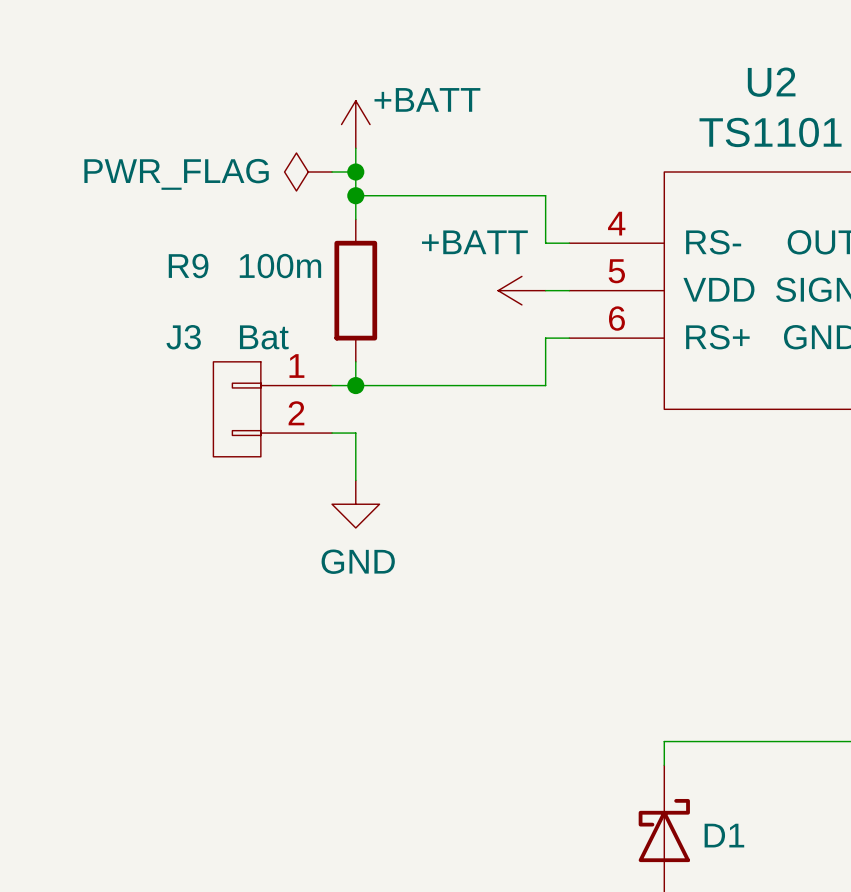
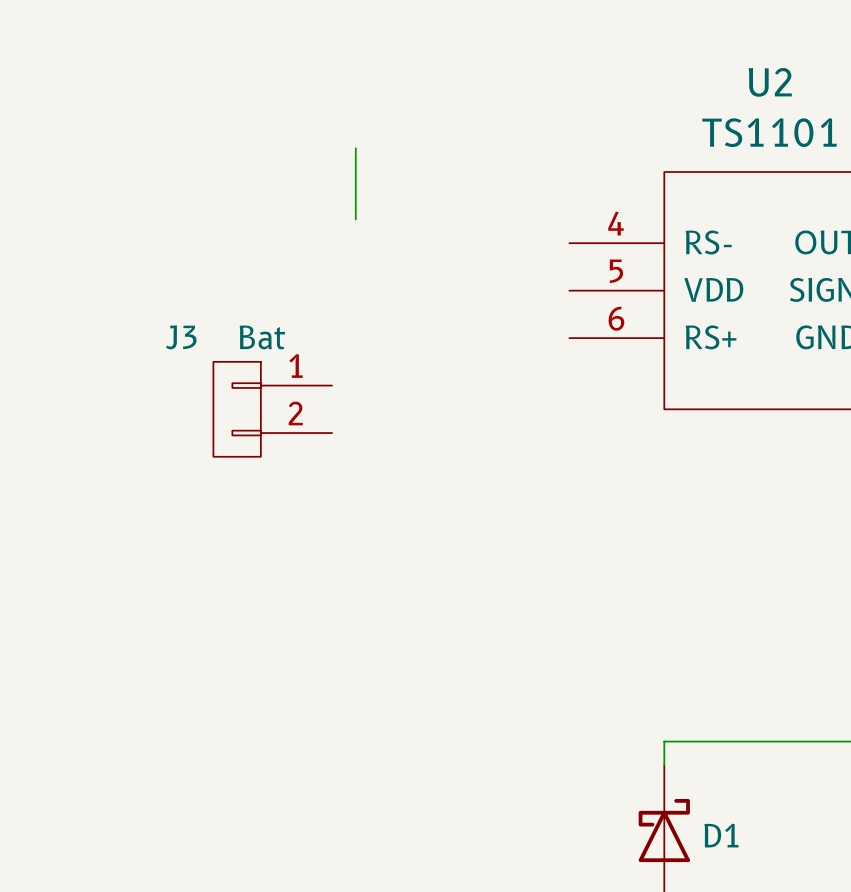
power symbol: +BATT (355, 124) -> none
power symbol: PWR_FLAG (308, 172) -> none
wire: (332, 172) (355, 172) -> none
junction: (355, 172) -> none
wire: (355, 195) (545, 195) (545, 243) (569, 243) -> none
junction: (355, 195) -> none
R9: 100m (355, 290) -> none
power symbol: +BATT (521, 290) -> none
wire: (545, 290) (569, 290) -> none
wire: (569, 338) (545, 338) (545, 385) (332, 385) -> none
wire: (355, 361) (355, 385) -> none
junction: (355, 385) -> none
wire: (332, 433) (355, 433) (355, 480) -> none
power symbol: GND (355, 504) -> none

